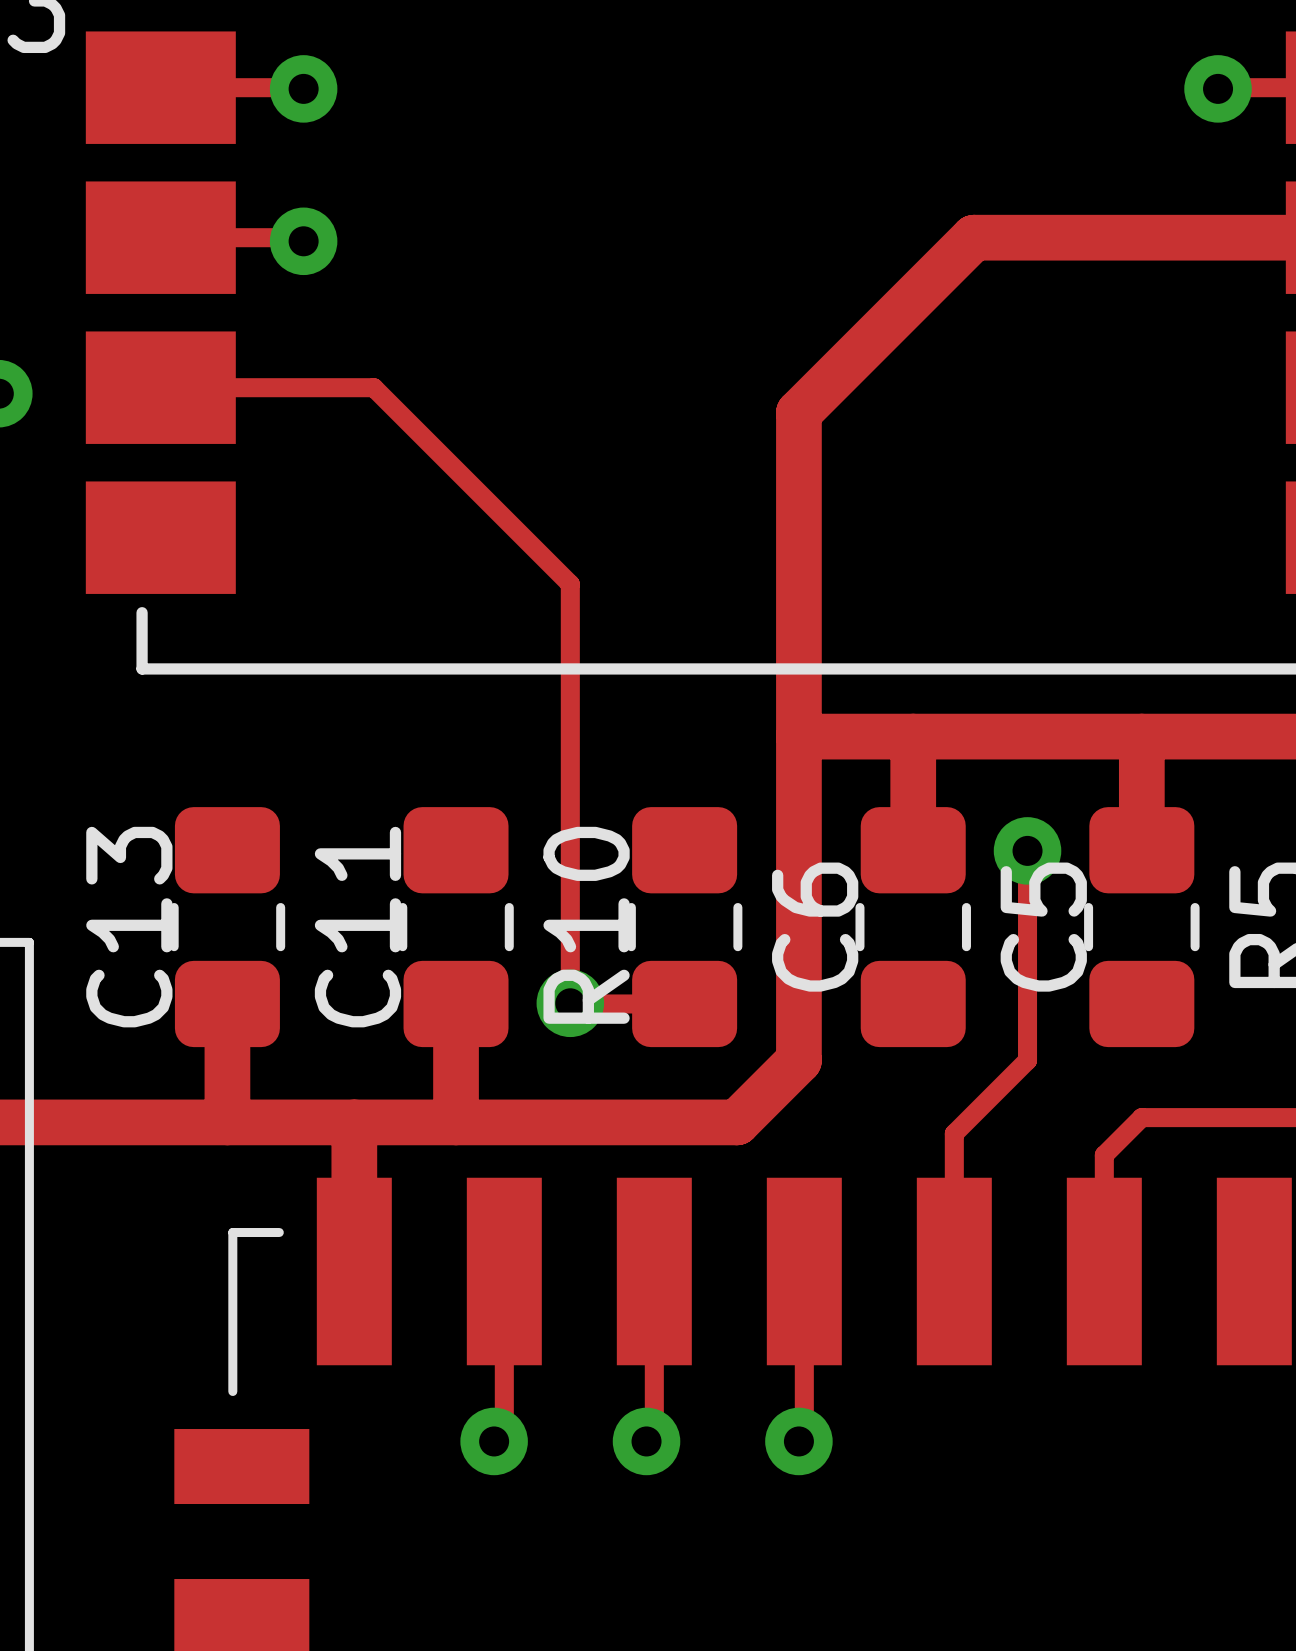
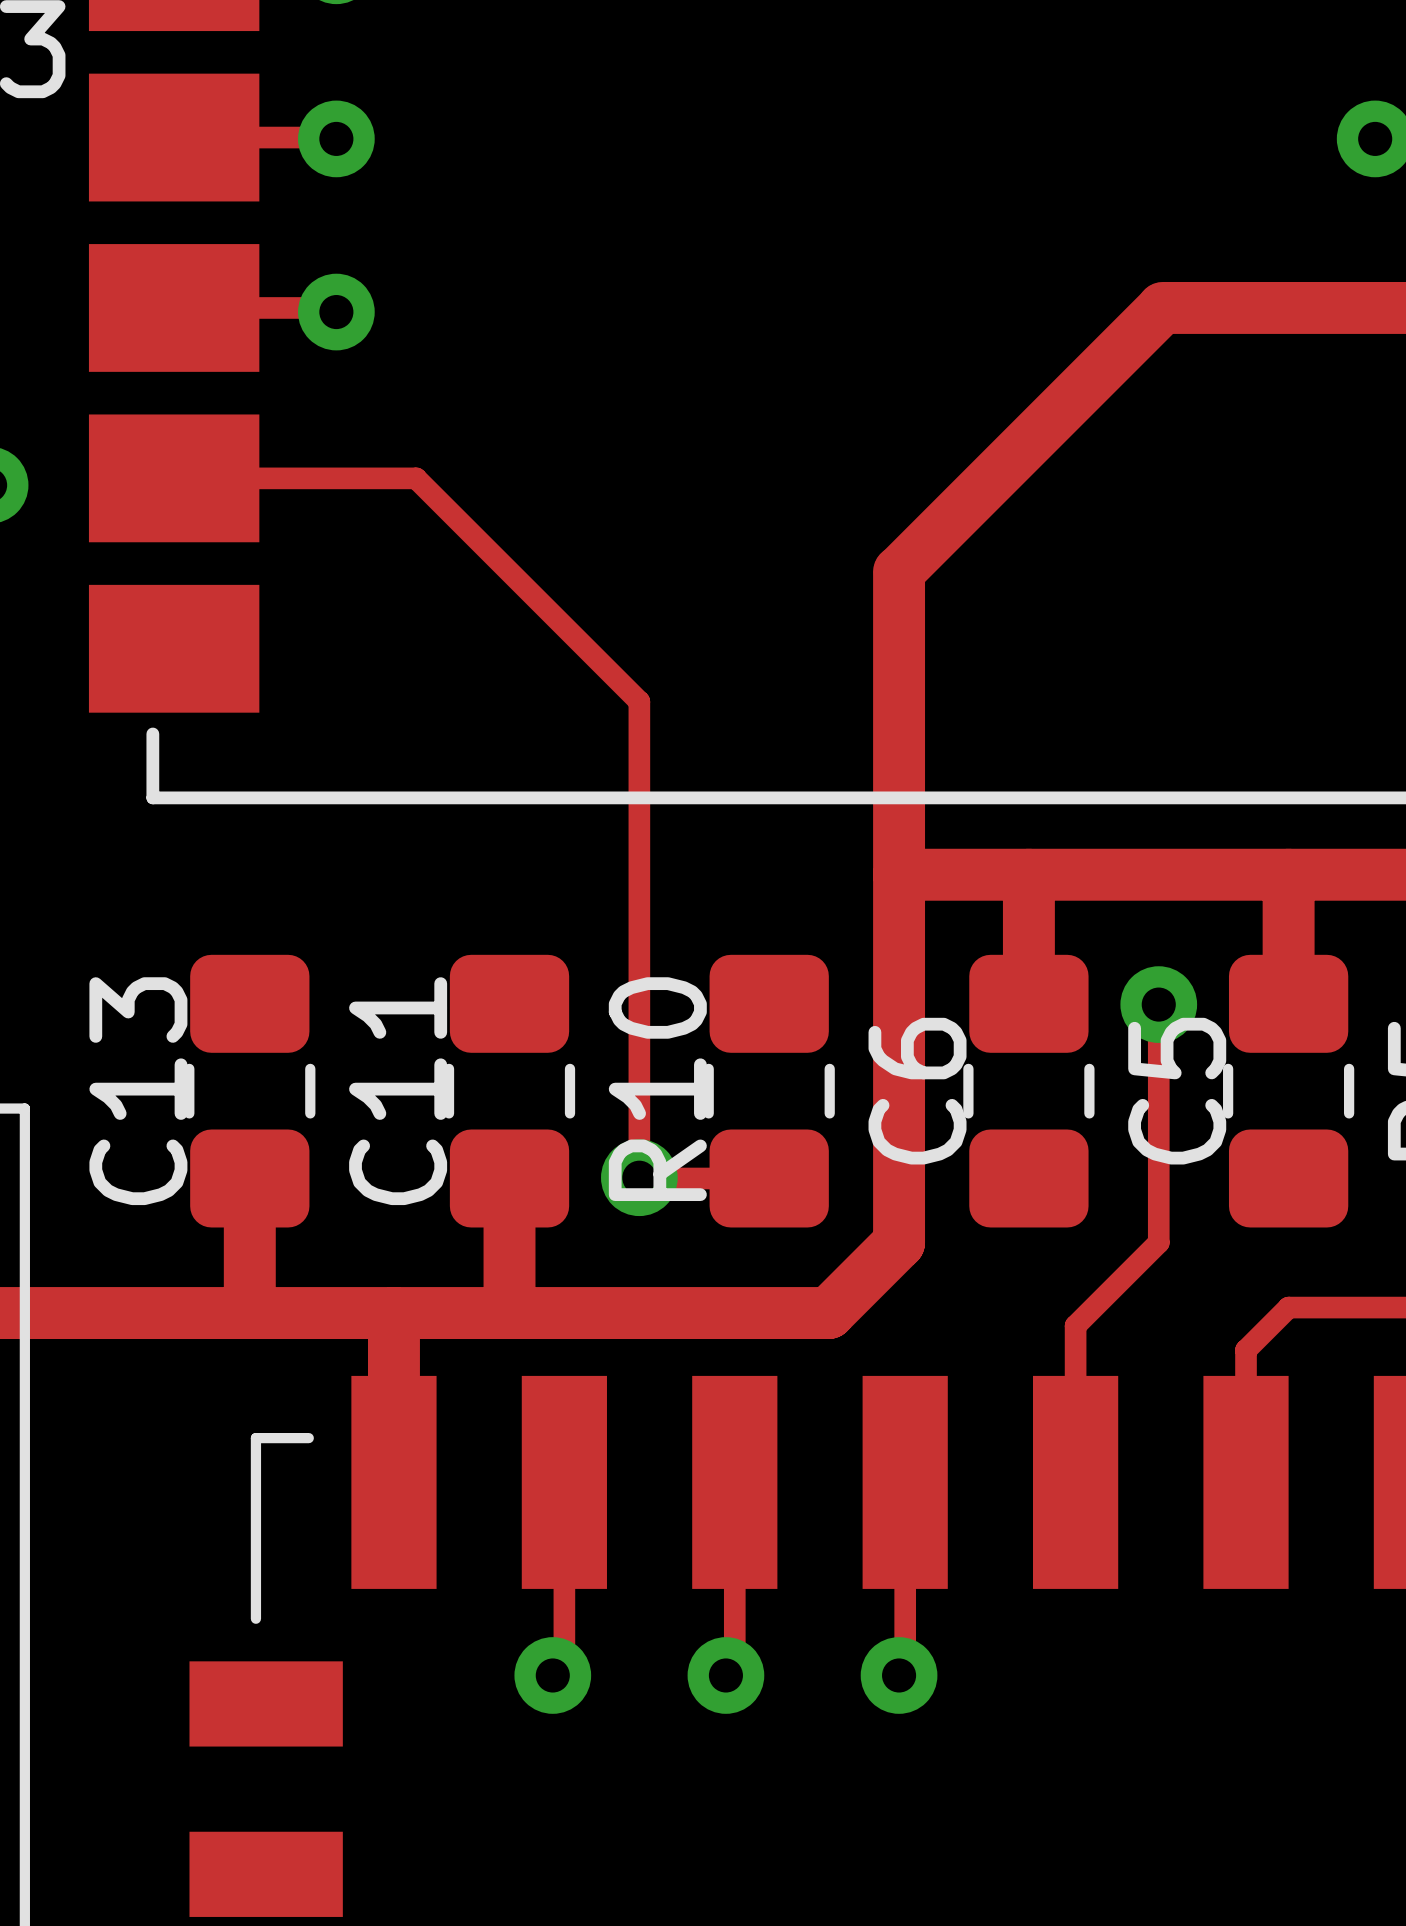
track: (1031, 237) (973, 237) (798, 412) (798, 469) -> (1162, 307) (899, 571)

